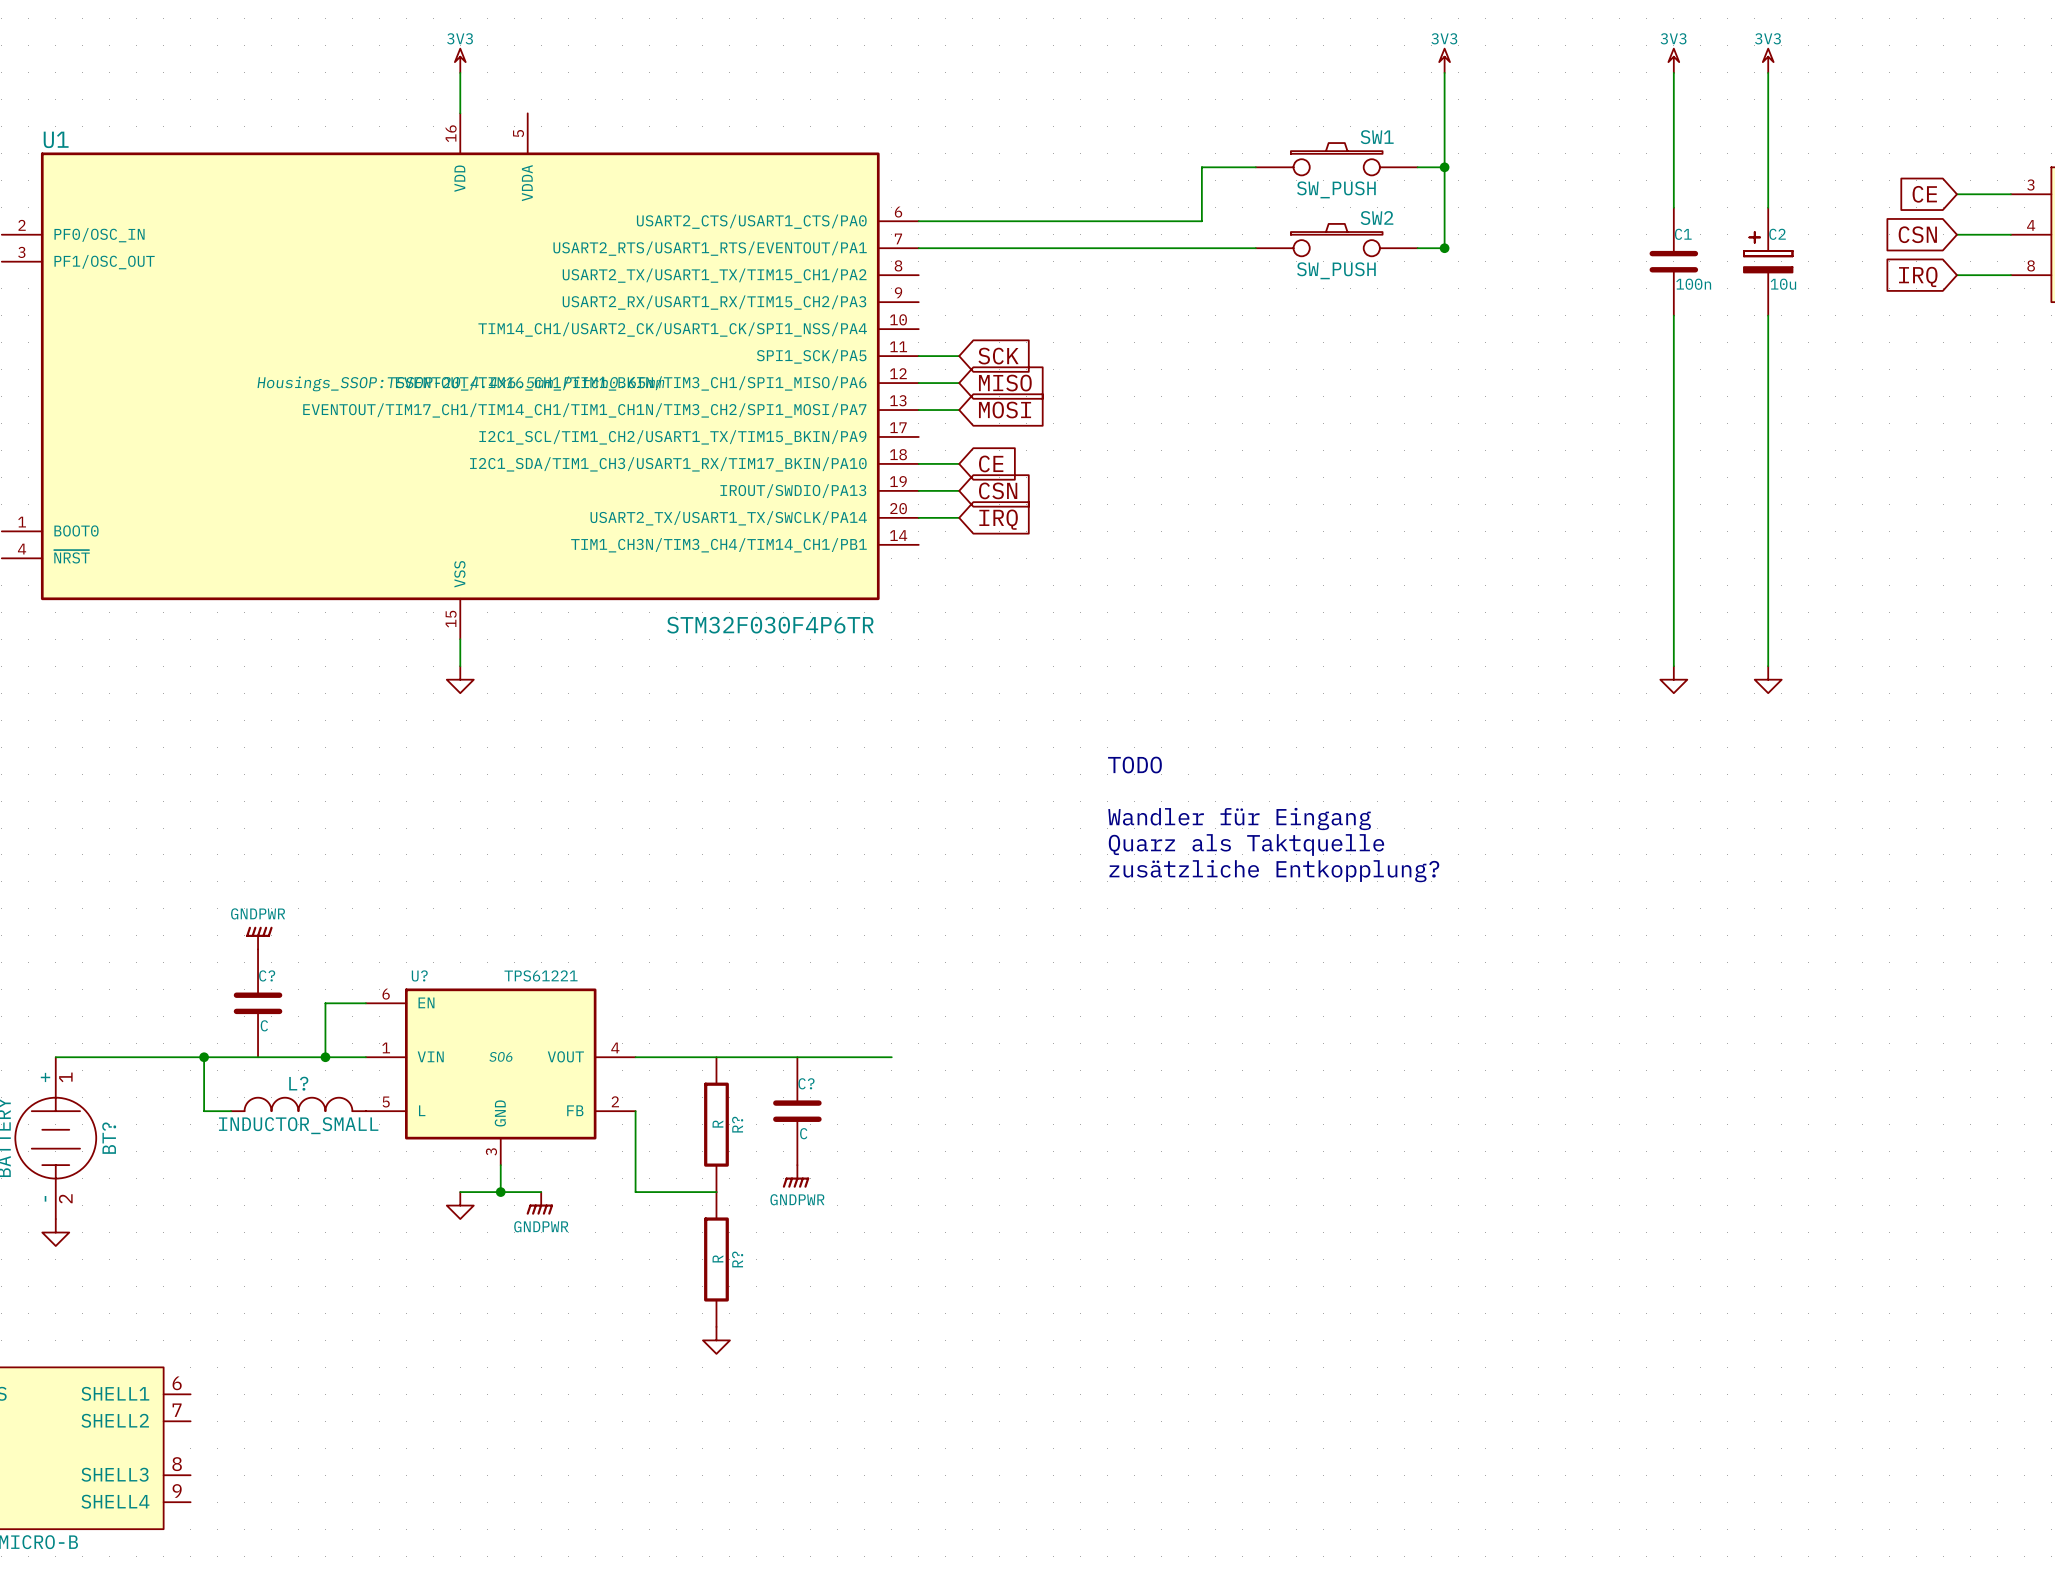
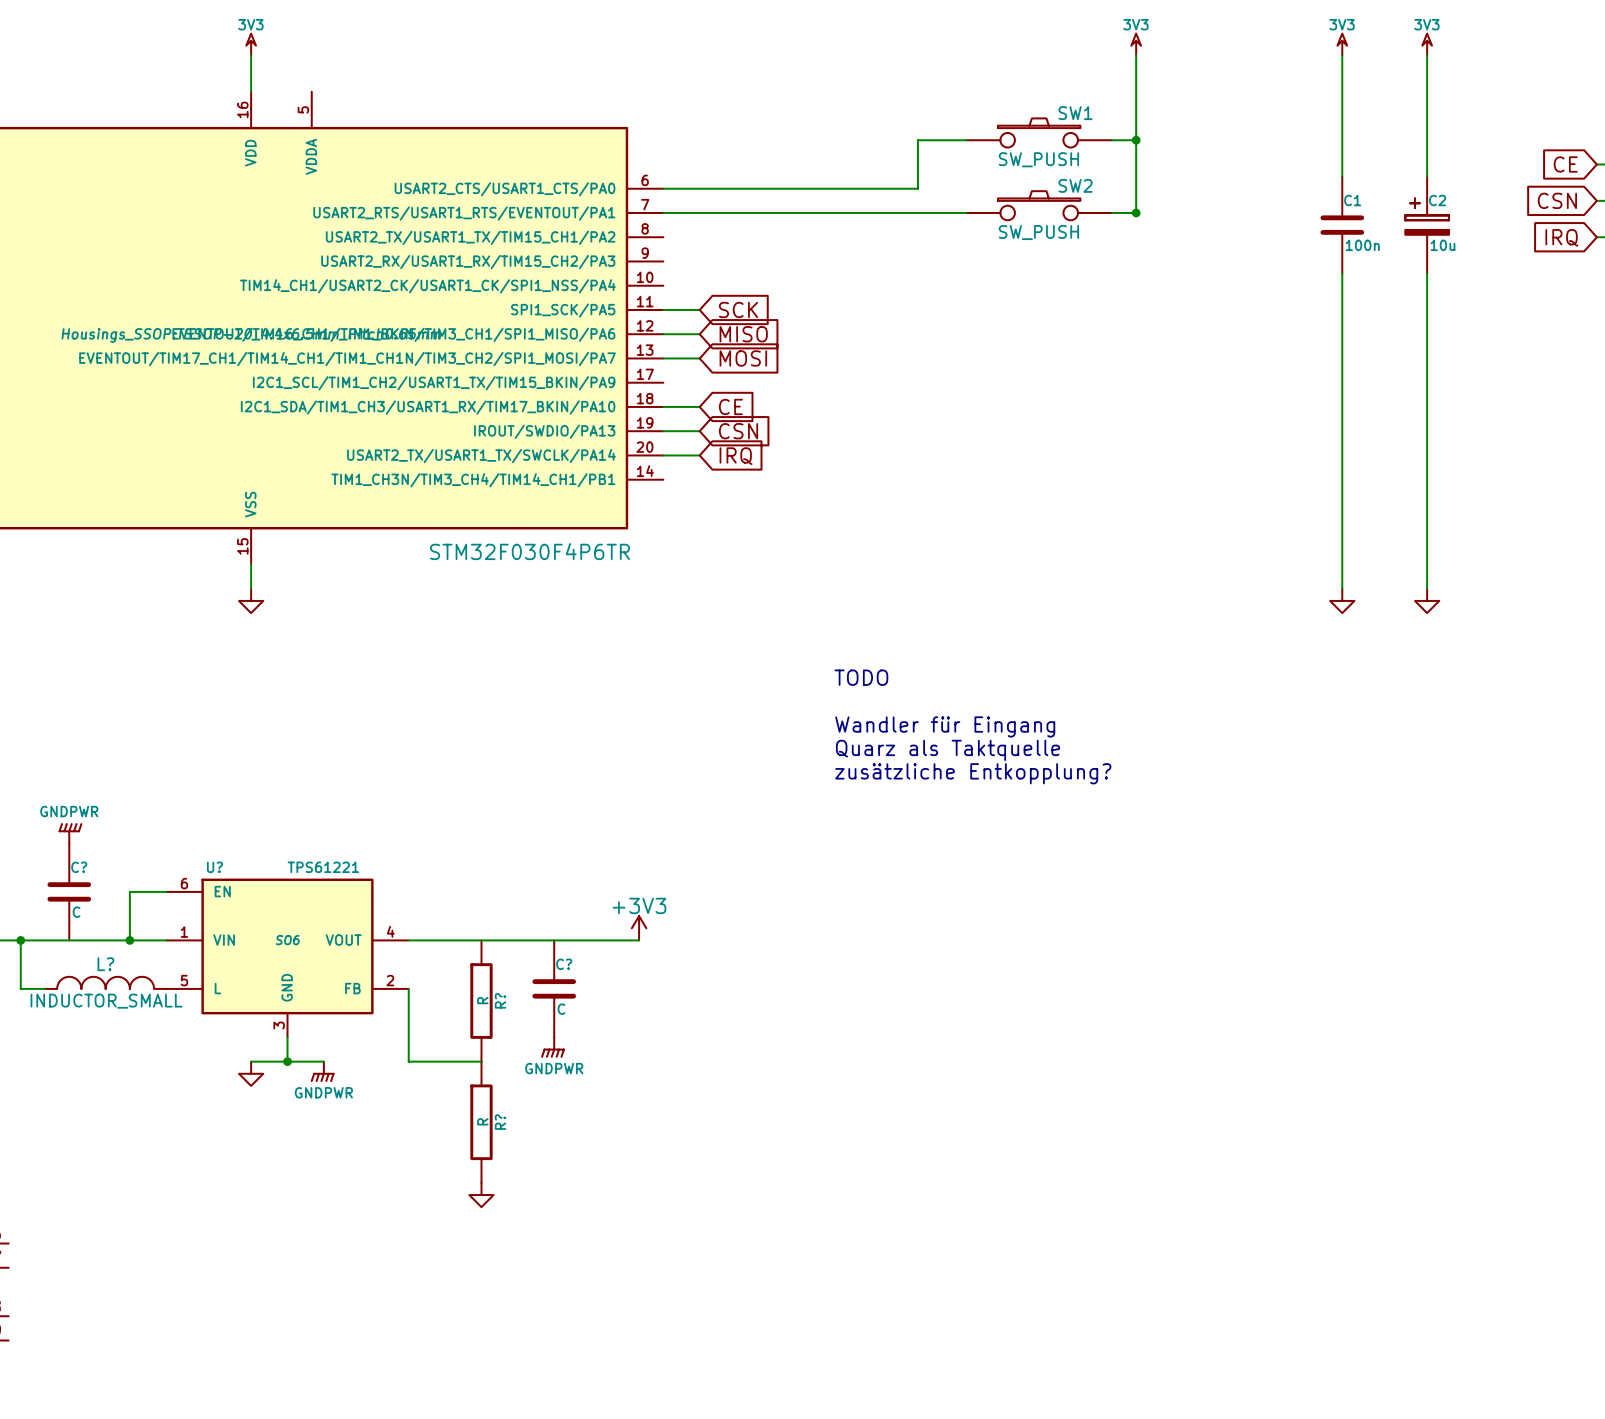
power symbol: none -> +3V3 (639, 928)

